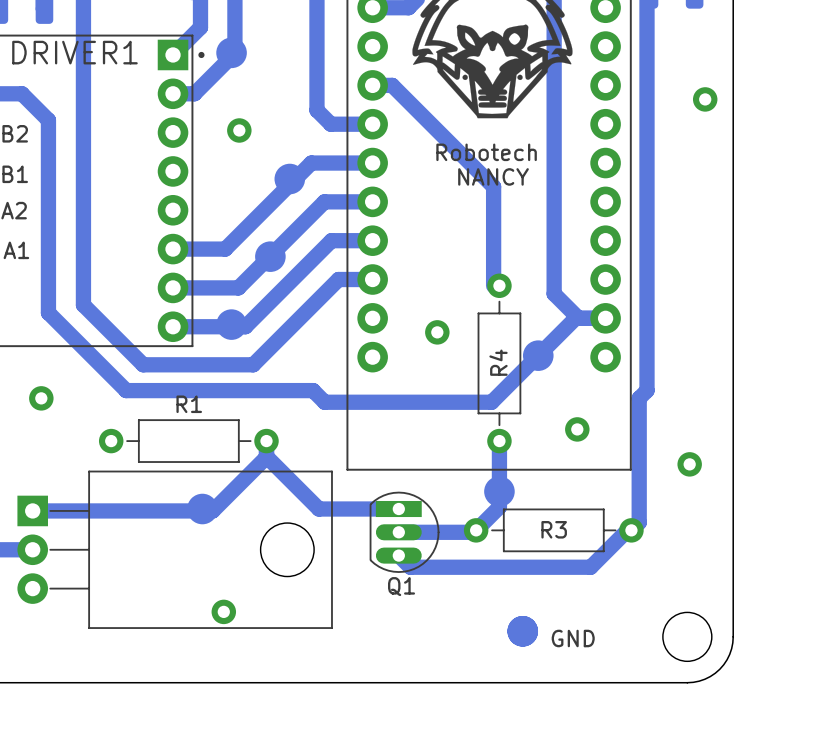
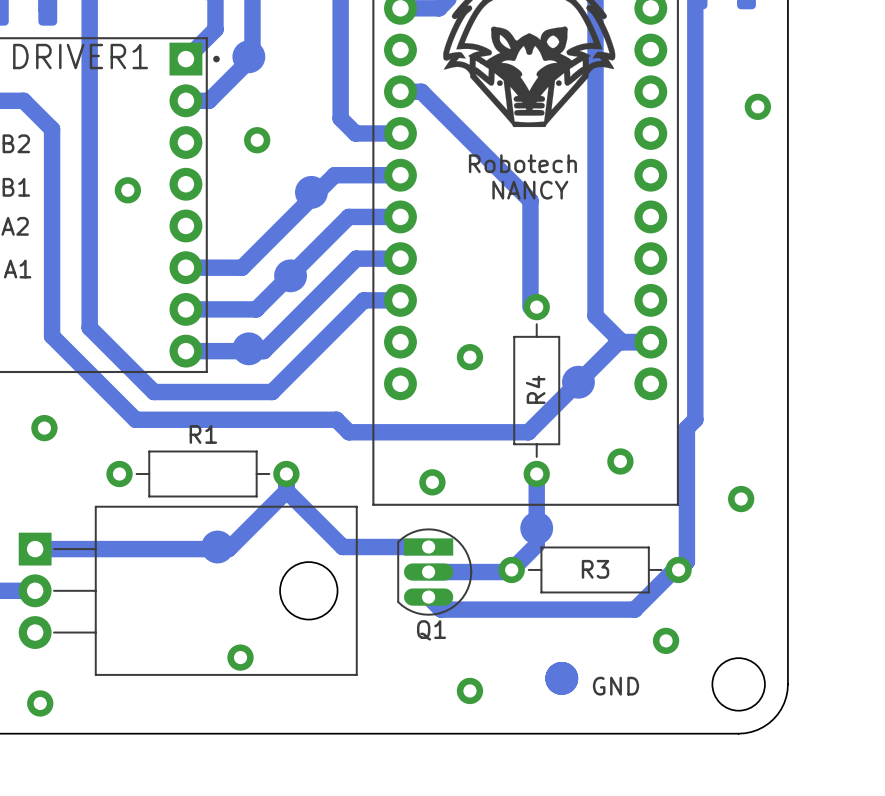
via: none -> (127, 190)
via: none -> (432, 482)
via: none -> (666, 640)
via: none -> (469, 690)
via: none -> (40, 703)

